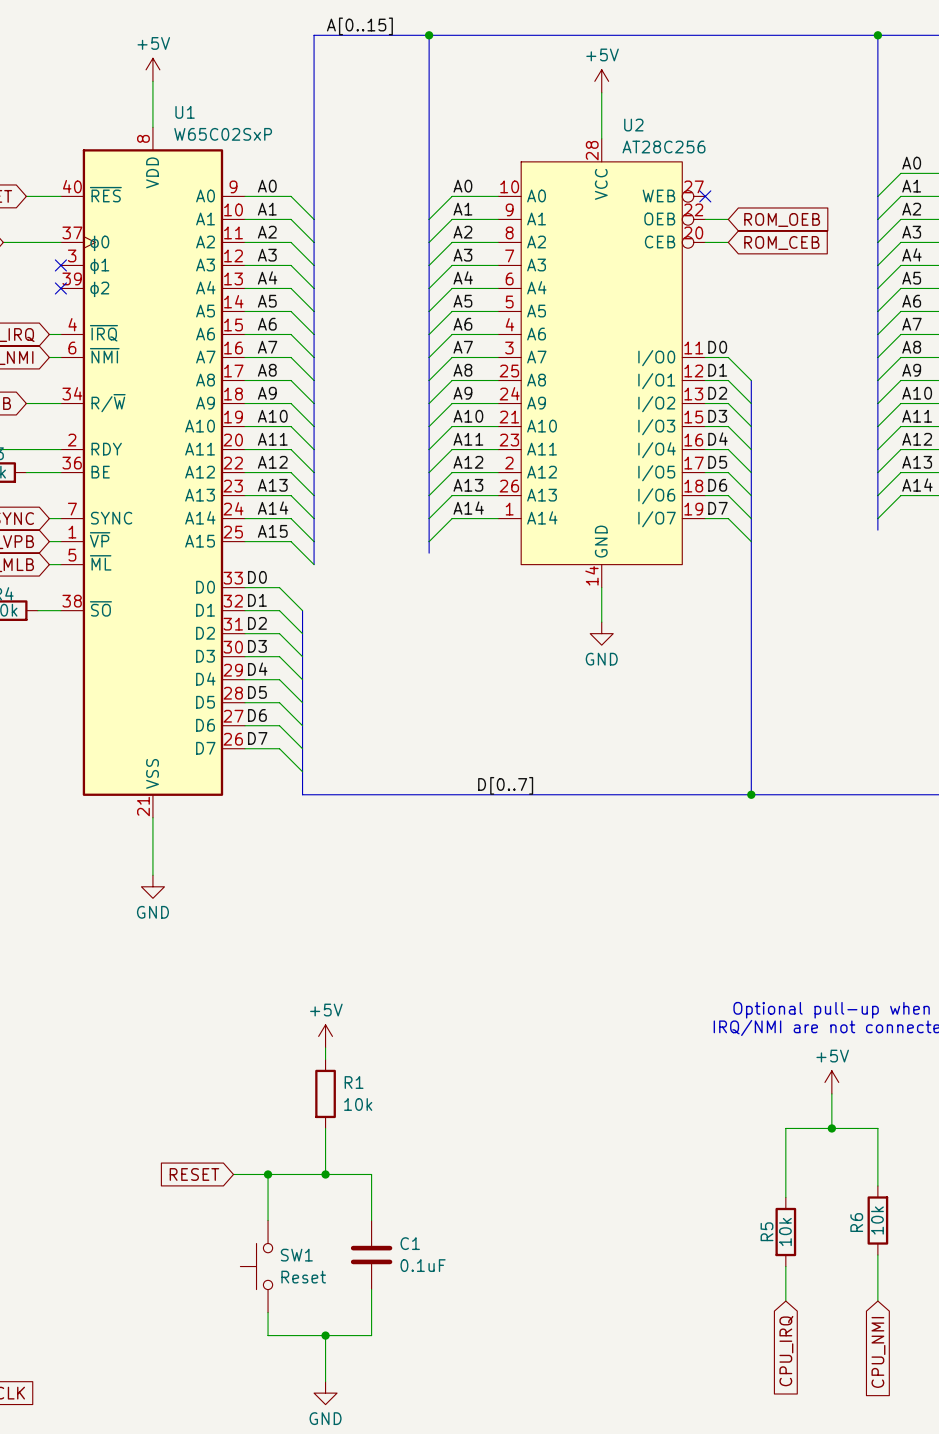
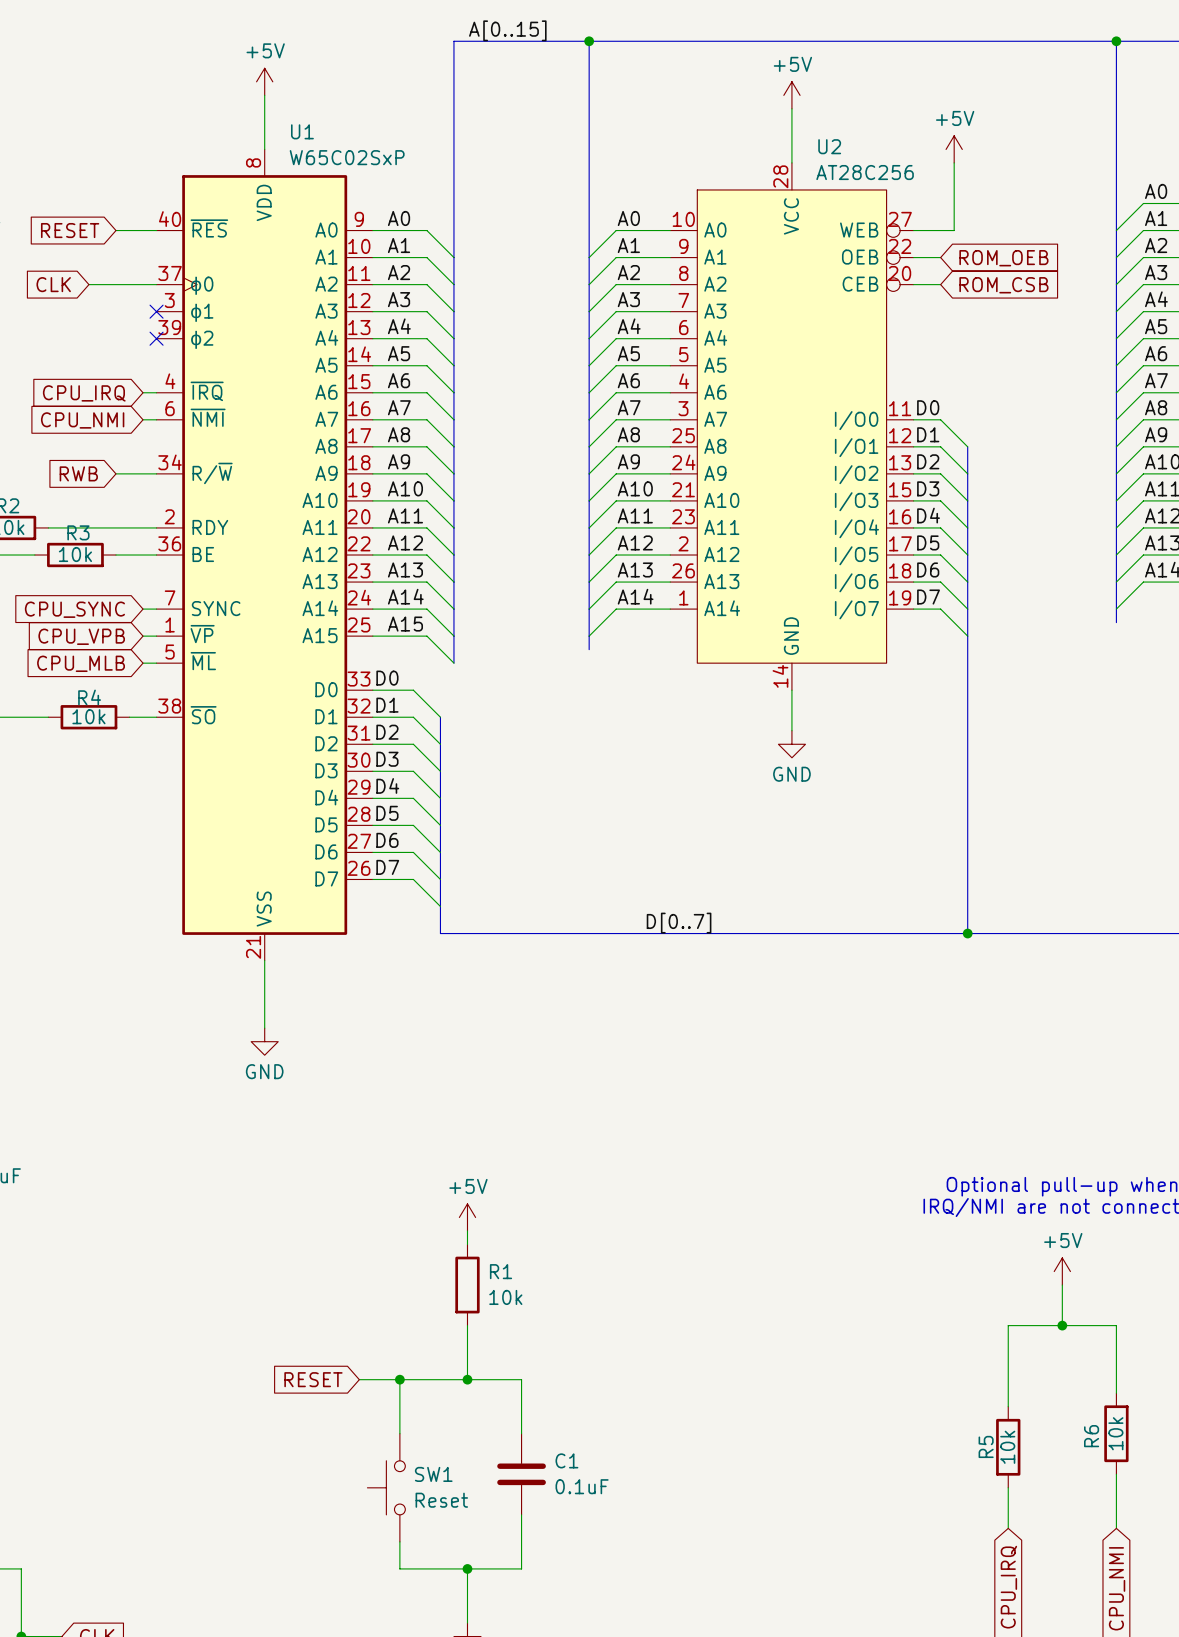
power symbol: none -> +5V (954, 149)
wire: none -> (954, 162) (954, 230) (913, 230)
no-connect mark: (705, 196) -> none
global label: ROM_CEB (781, 242) -> ROM_CSB (1003, 285)

